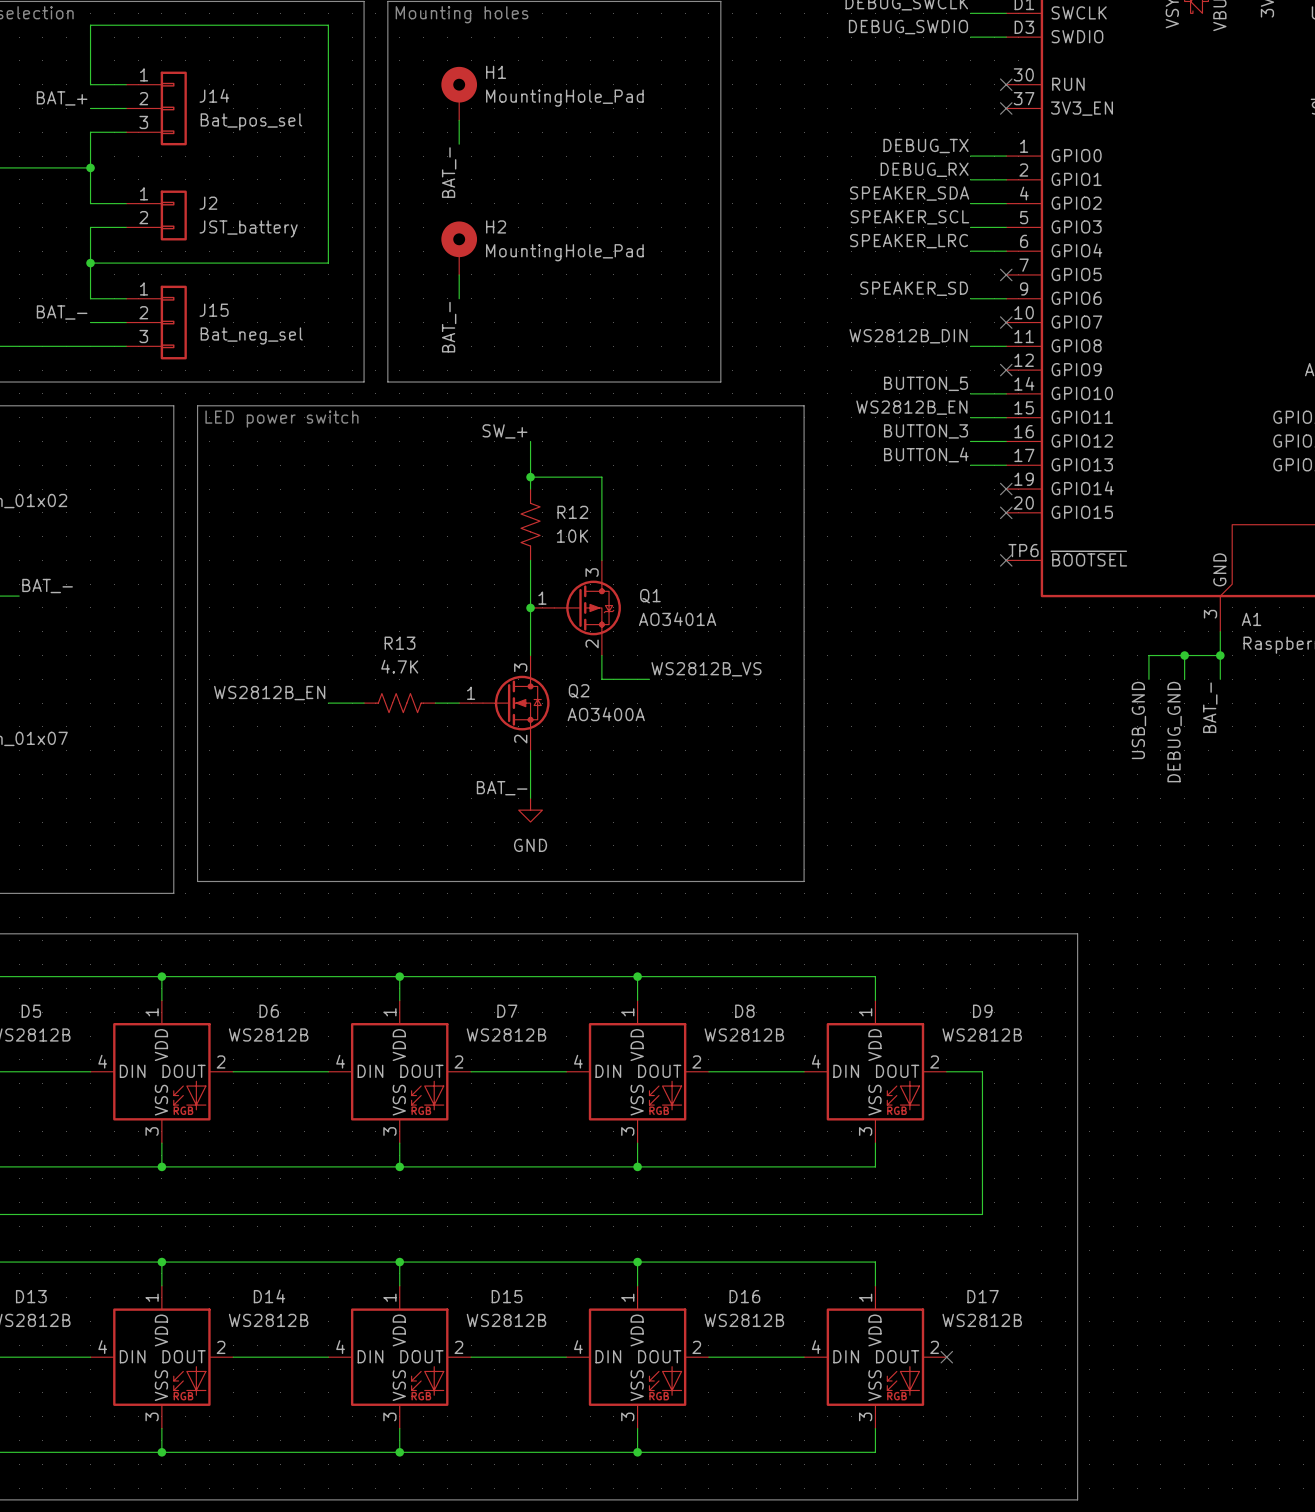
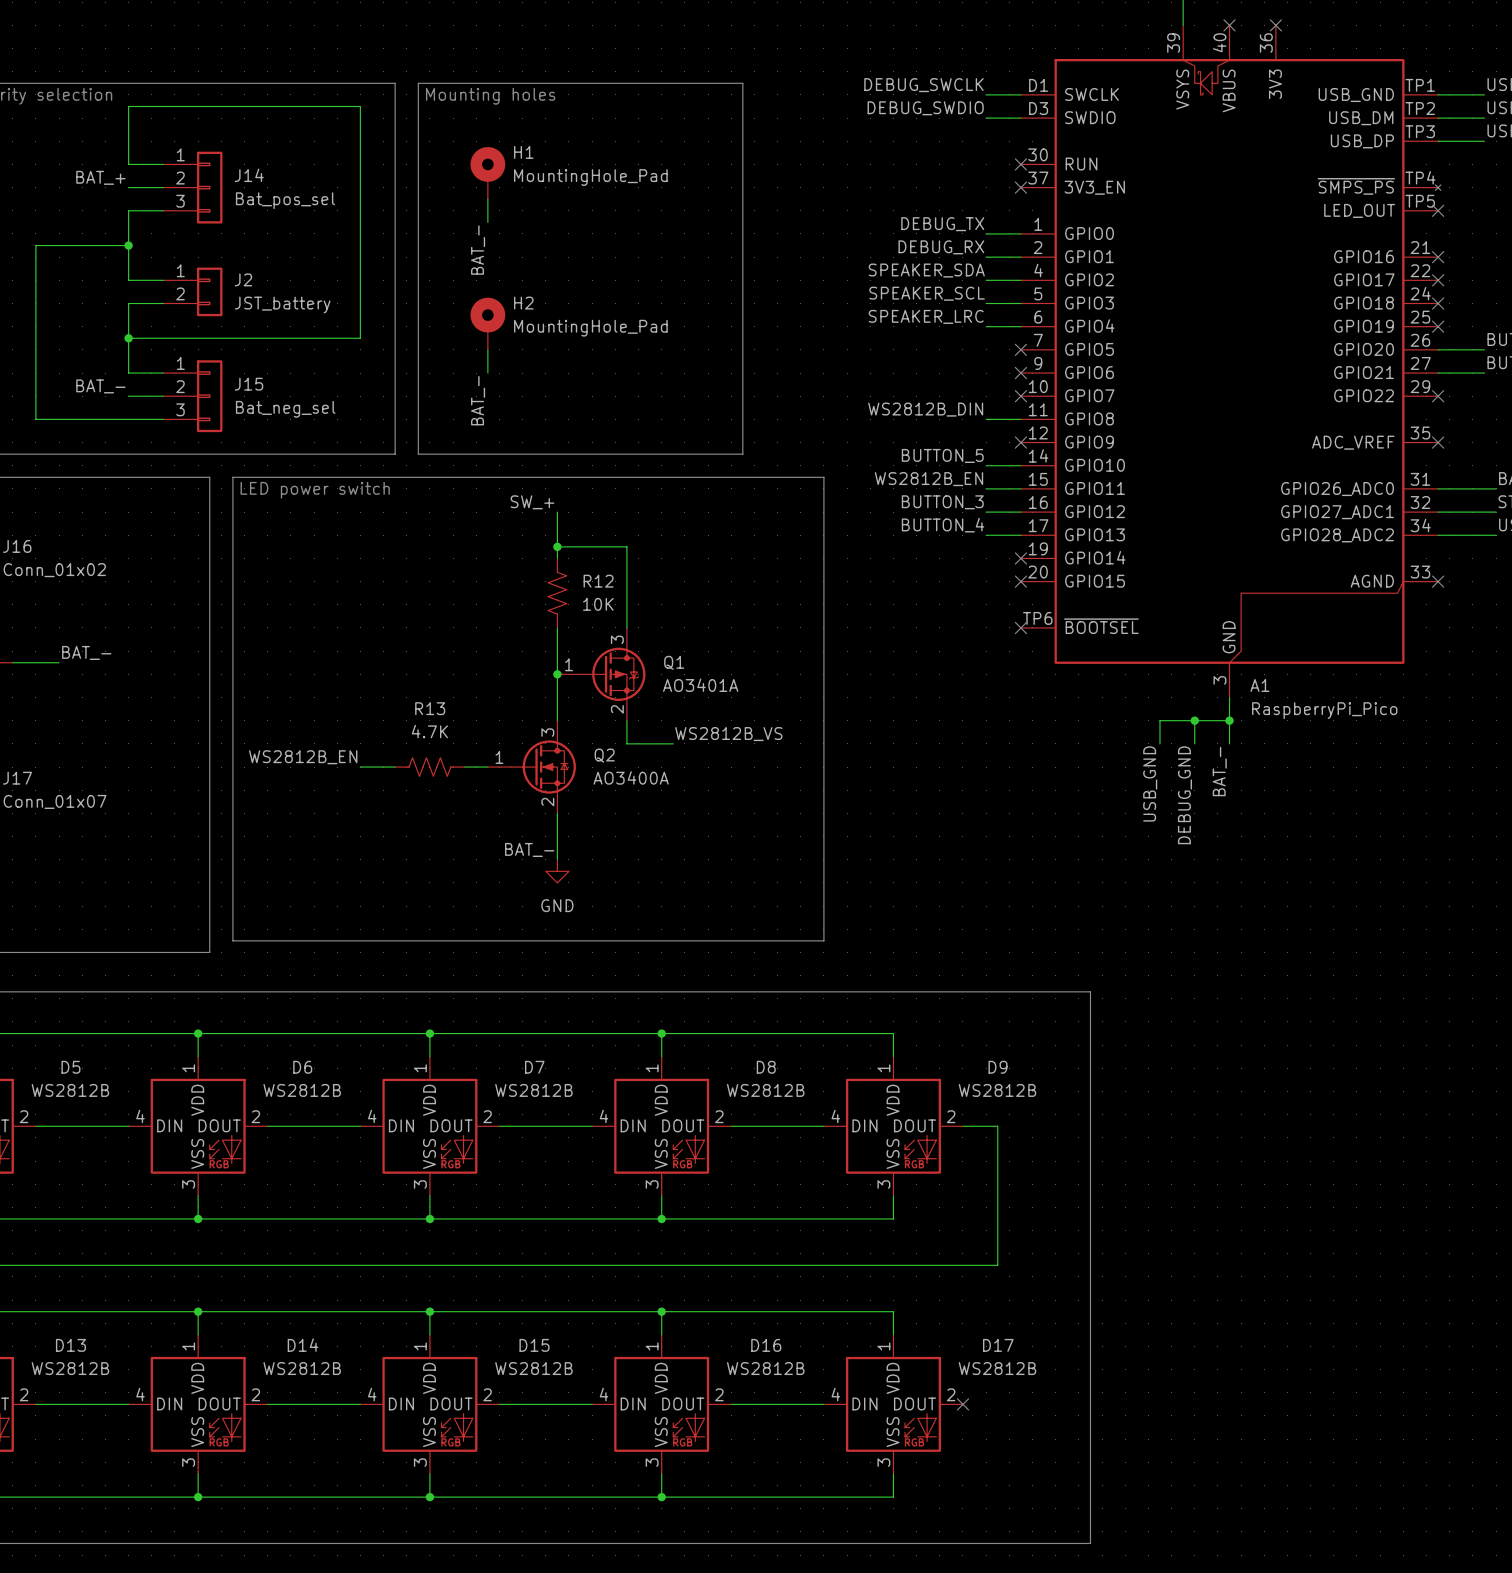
label: SPEAKER_SD (914, 288) -> none
wire: (970, 298) (1006, 298) -> none
no-connect mark: none -> (1020, 373)

